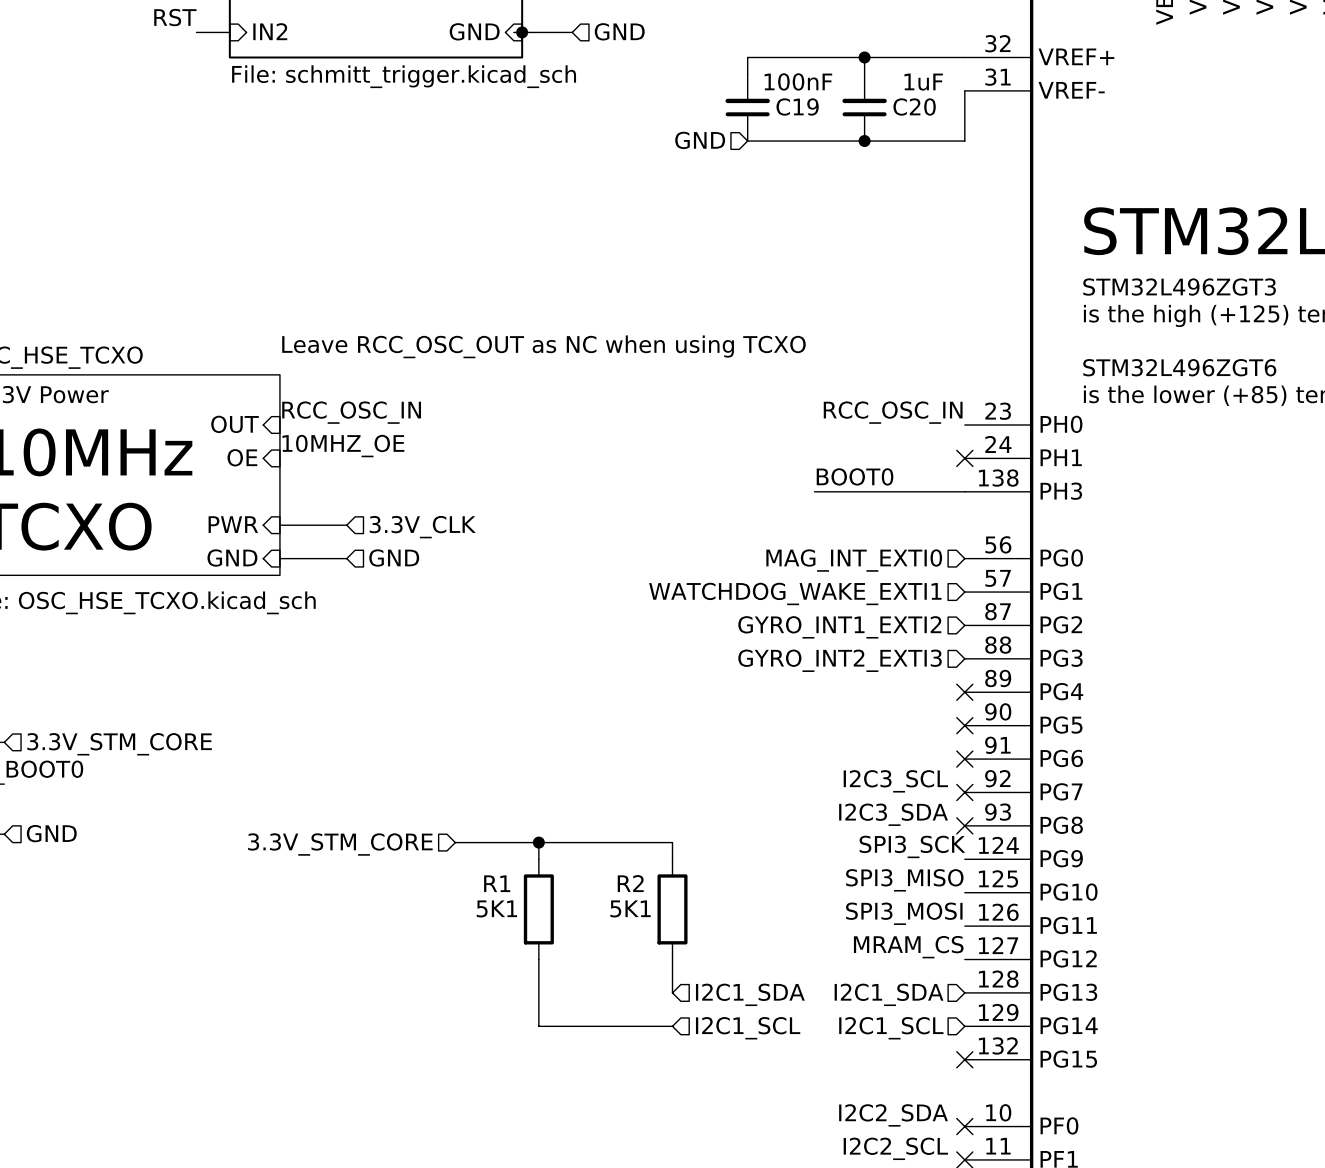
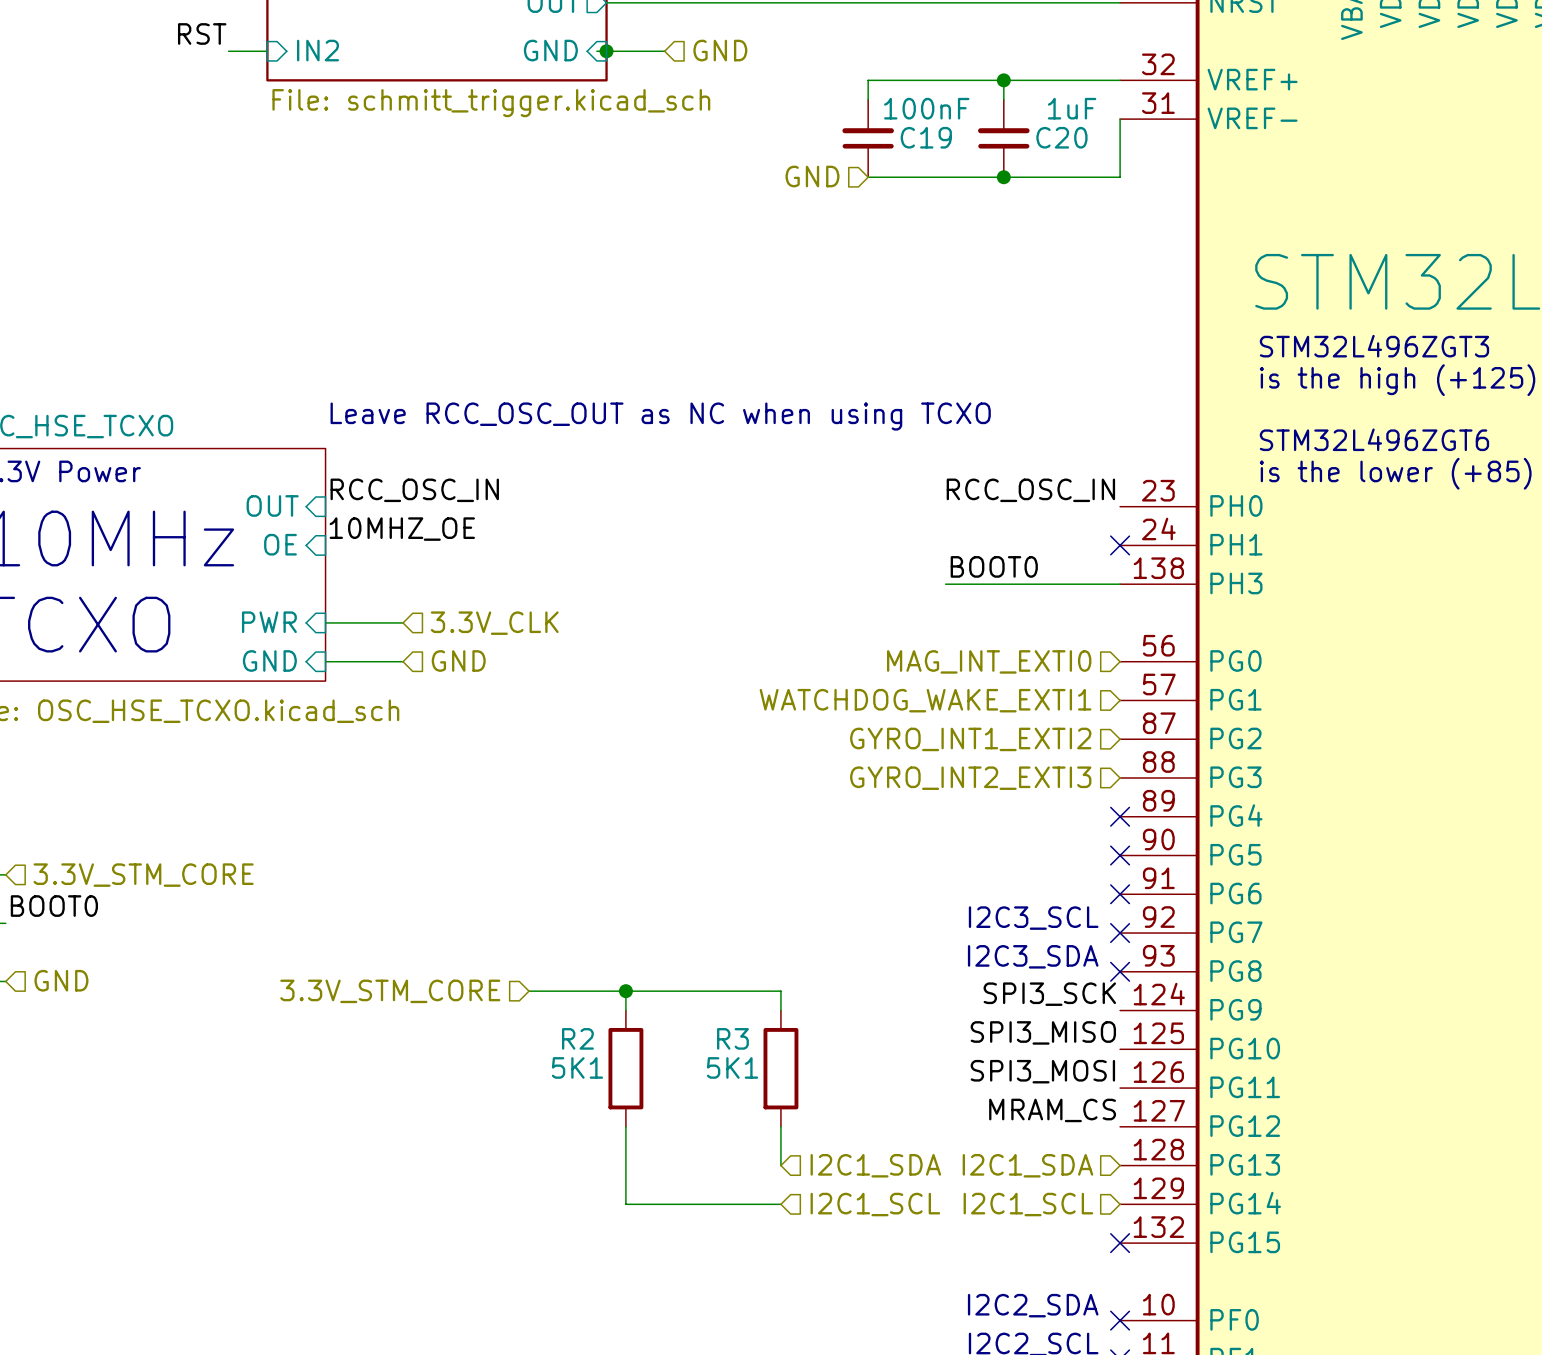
R1 name: R1 (497, 883) -> R2 (577, 1038)
R2 name: R2 (630, 883) -> R3 (732, 1038)

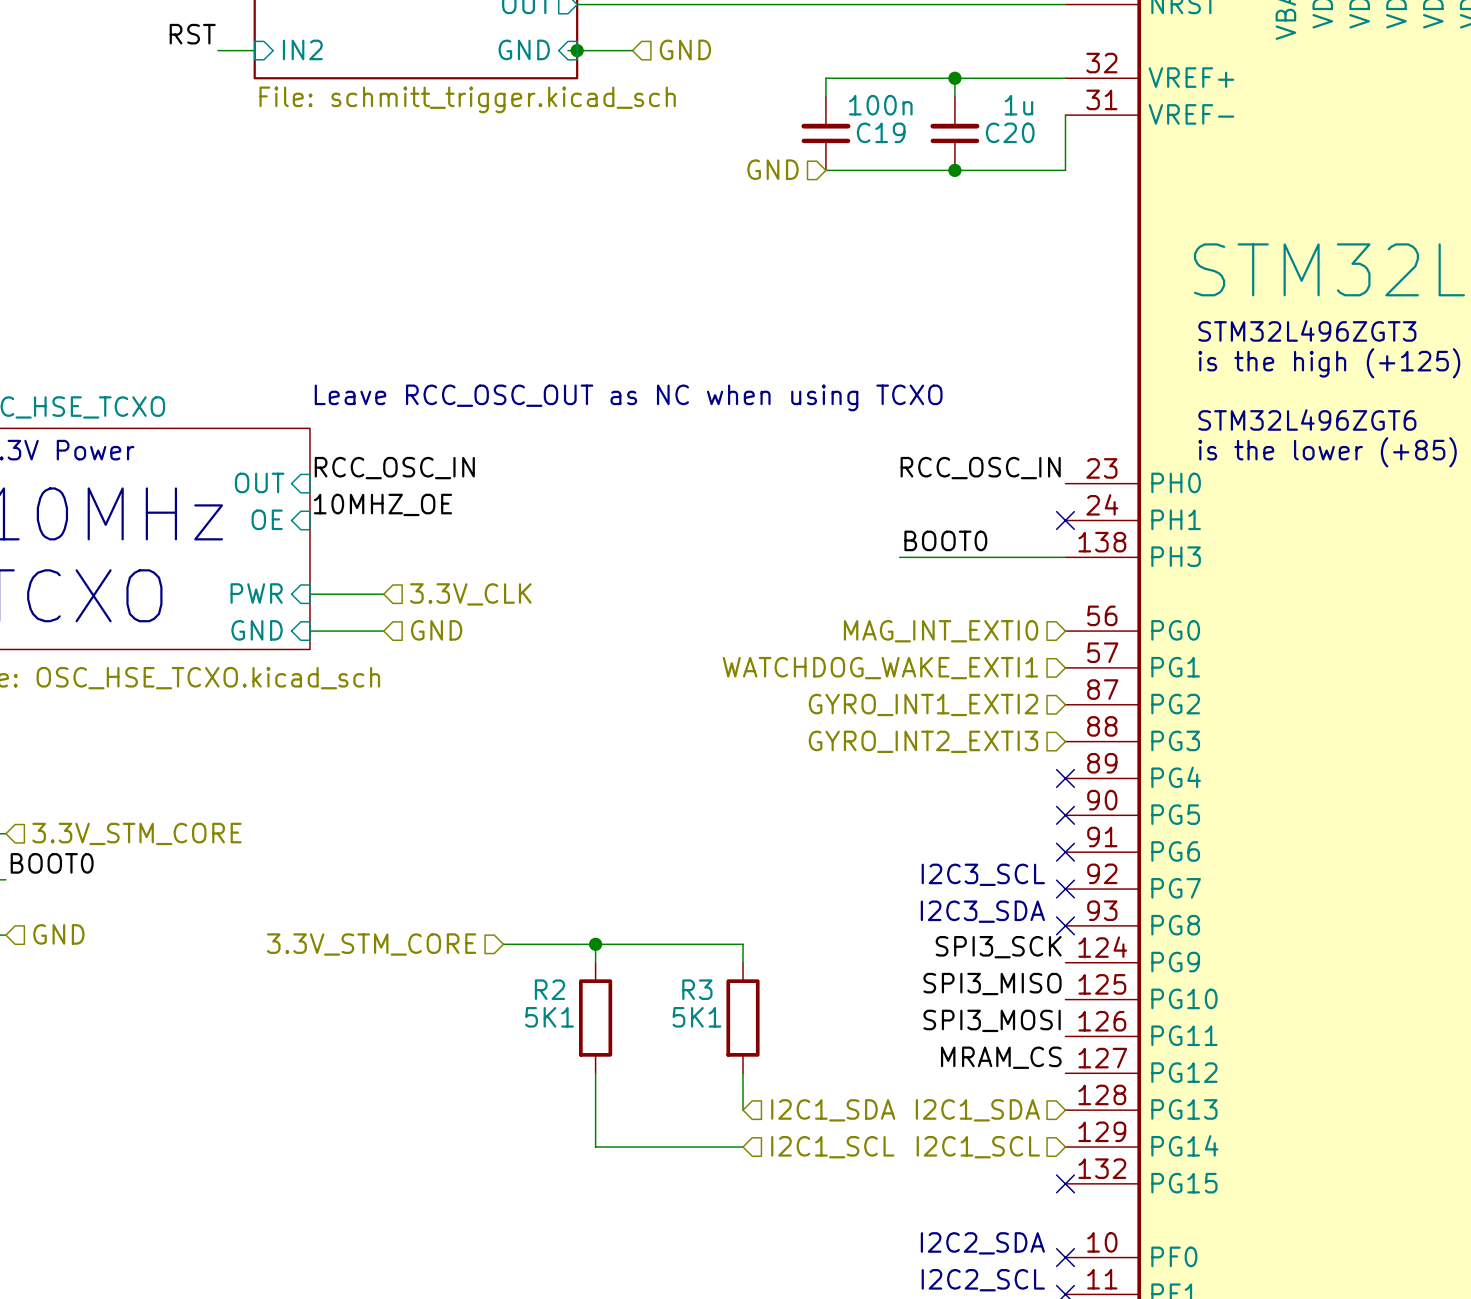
C19 value: 100nF (926, 108) -> 100n (880, 105)
C20 value: 1uF (1072, 108) -> 1u (1018, 105)

